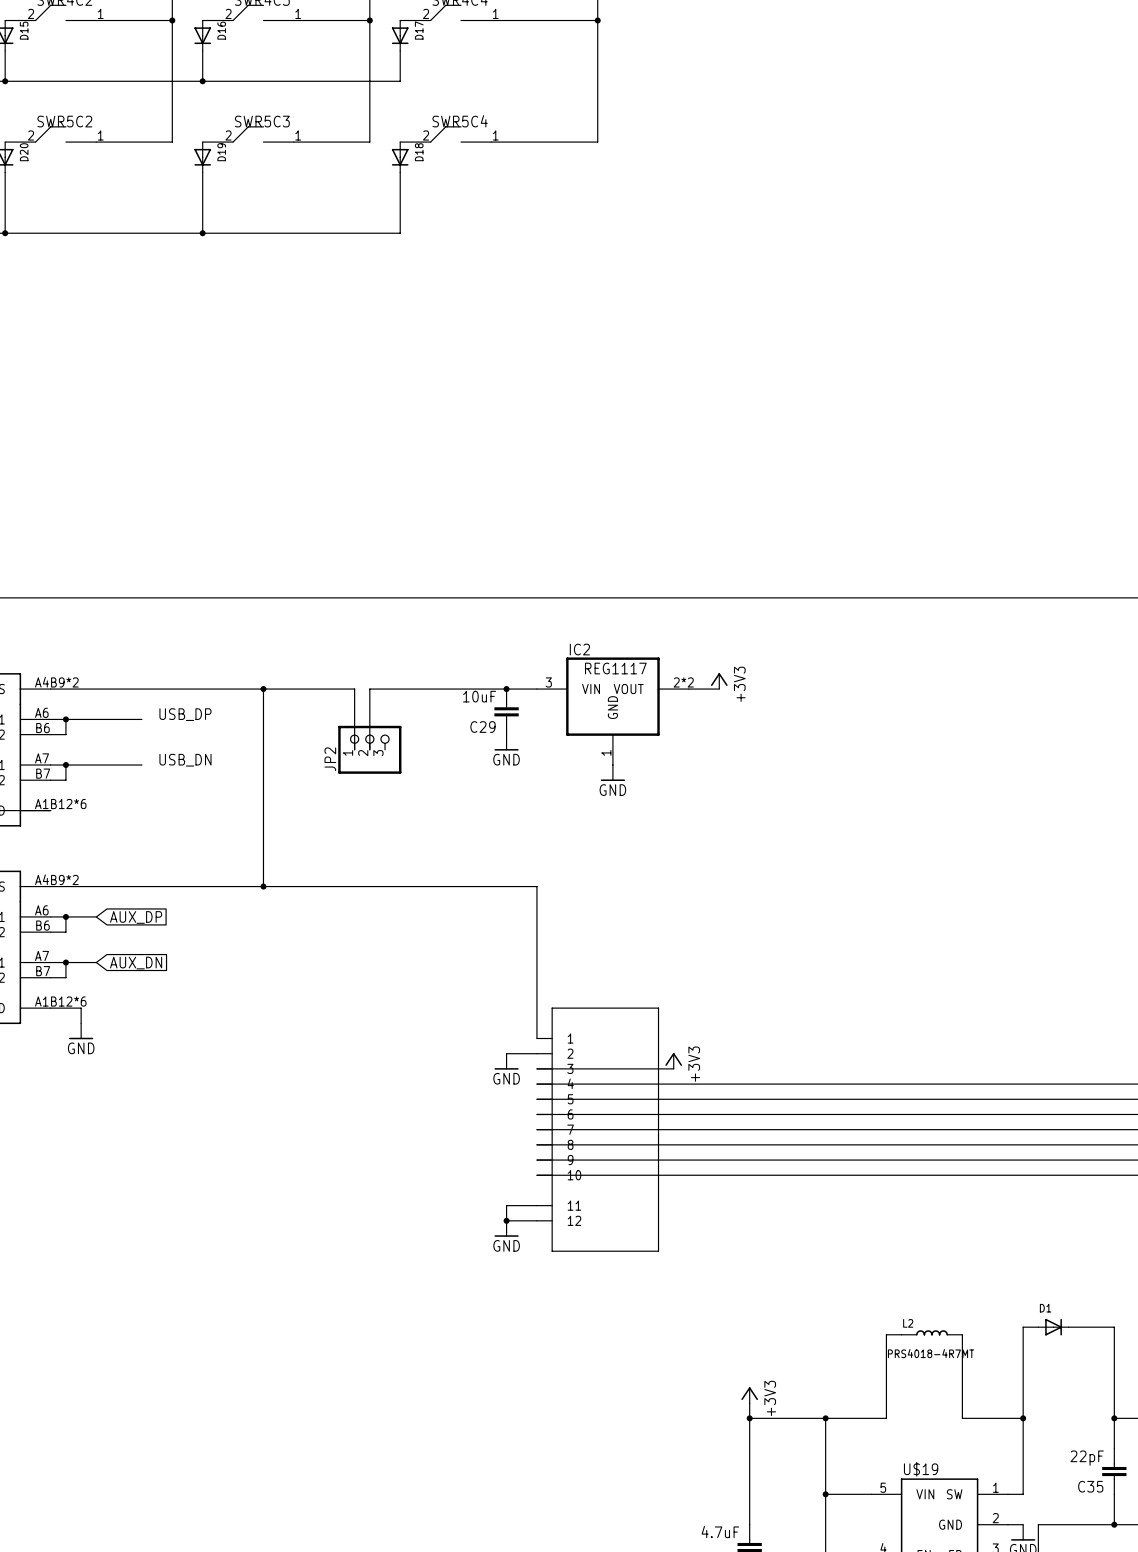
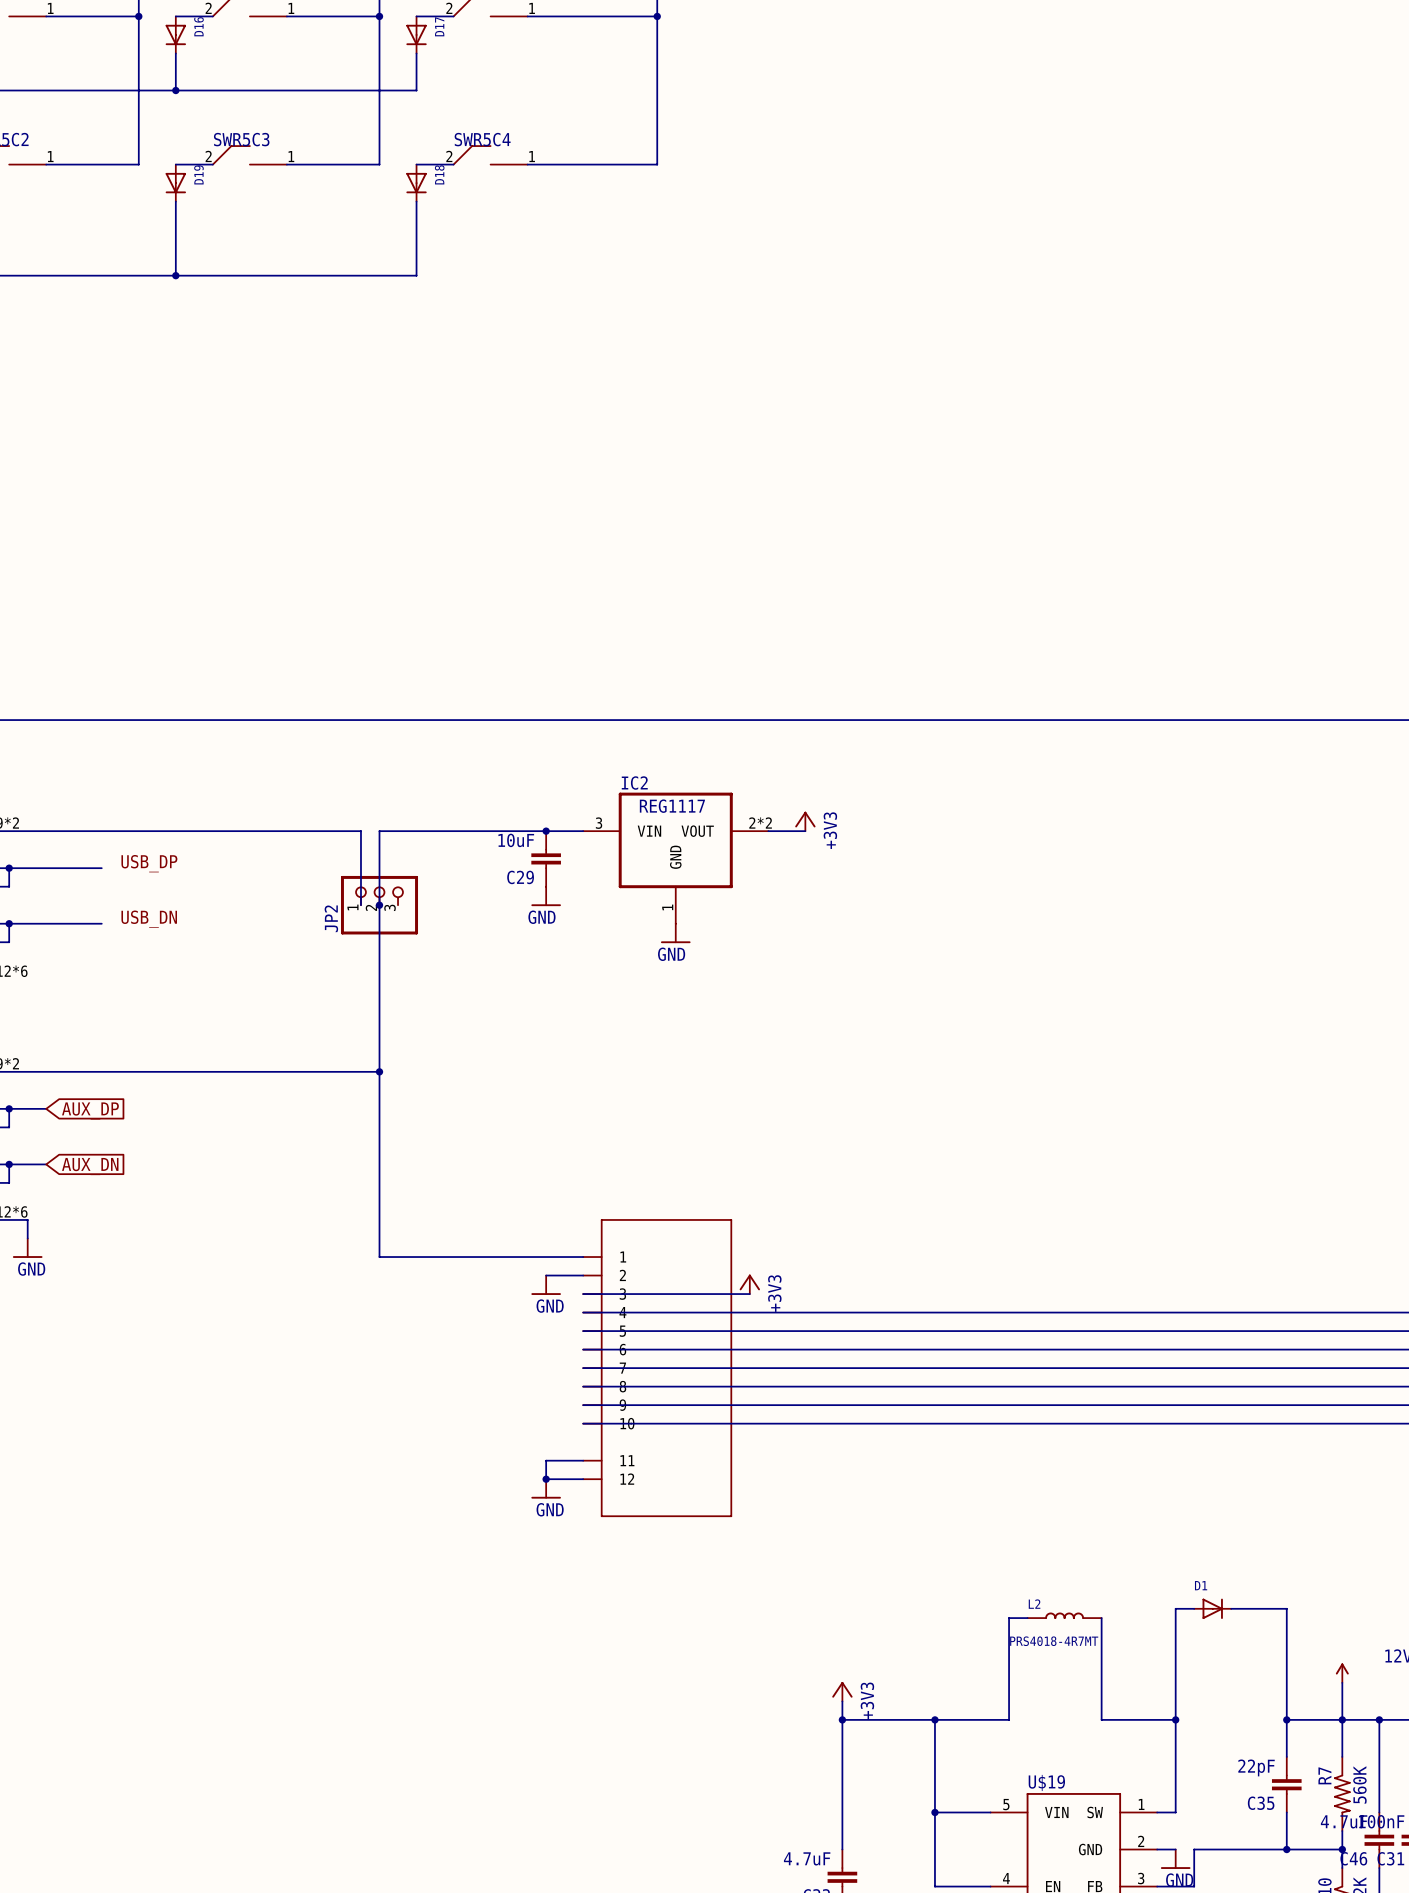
wire: (263, 689) (263, 886) -> none
junction: (263, 689) -> none
junction: none -> (379, 905)
junction: (263, 886) -> none
wire: (369, 886) (536, 886) (536, 1038) -> (379, 905) (379, 1257) (583, 1257)
junction: none -> (379, 1071)

